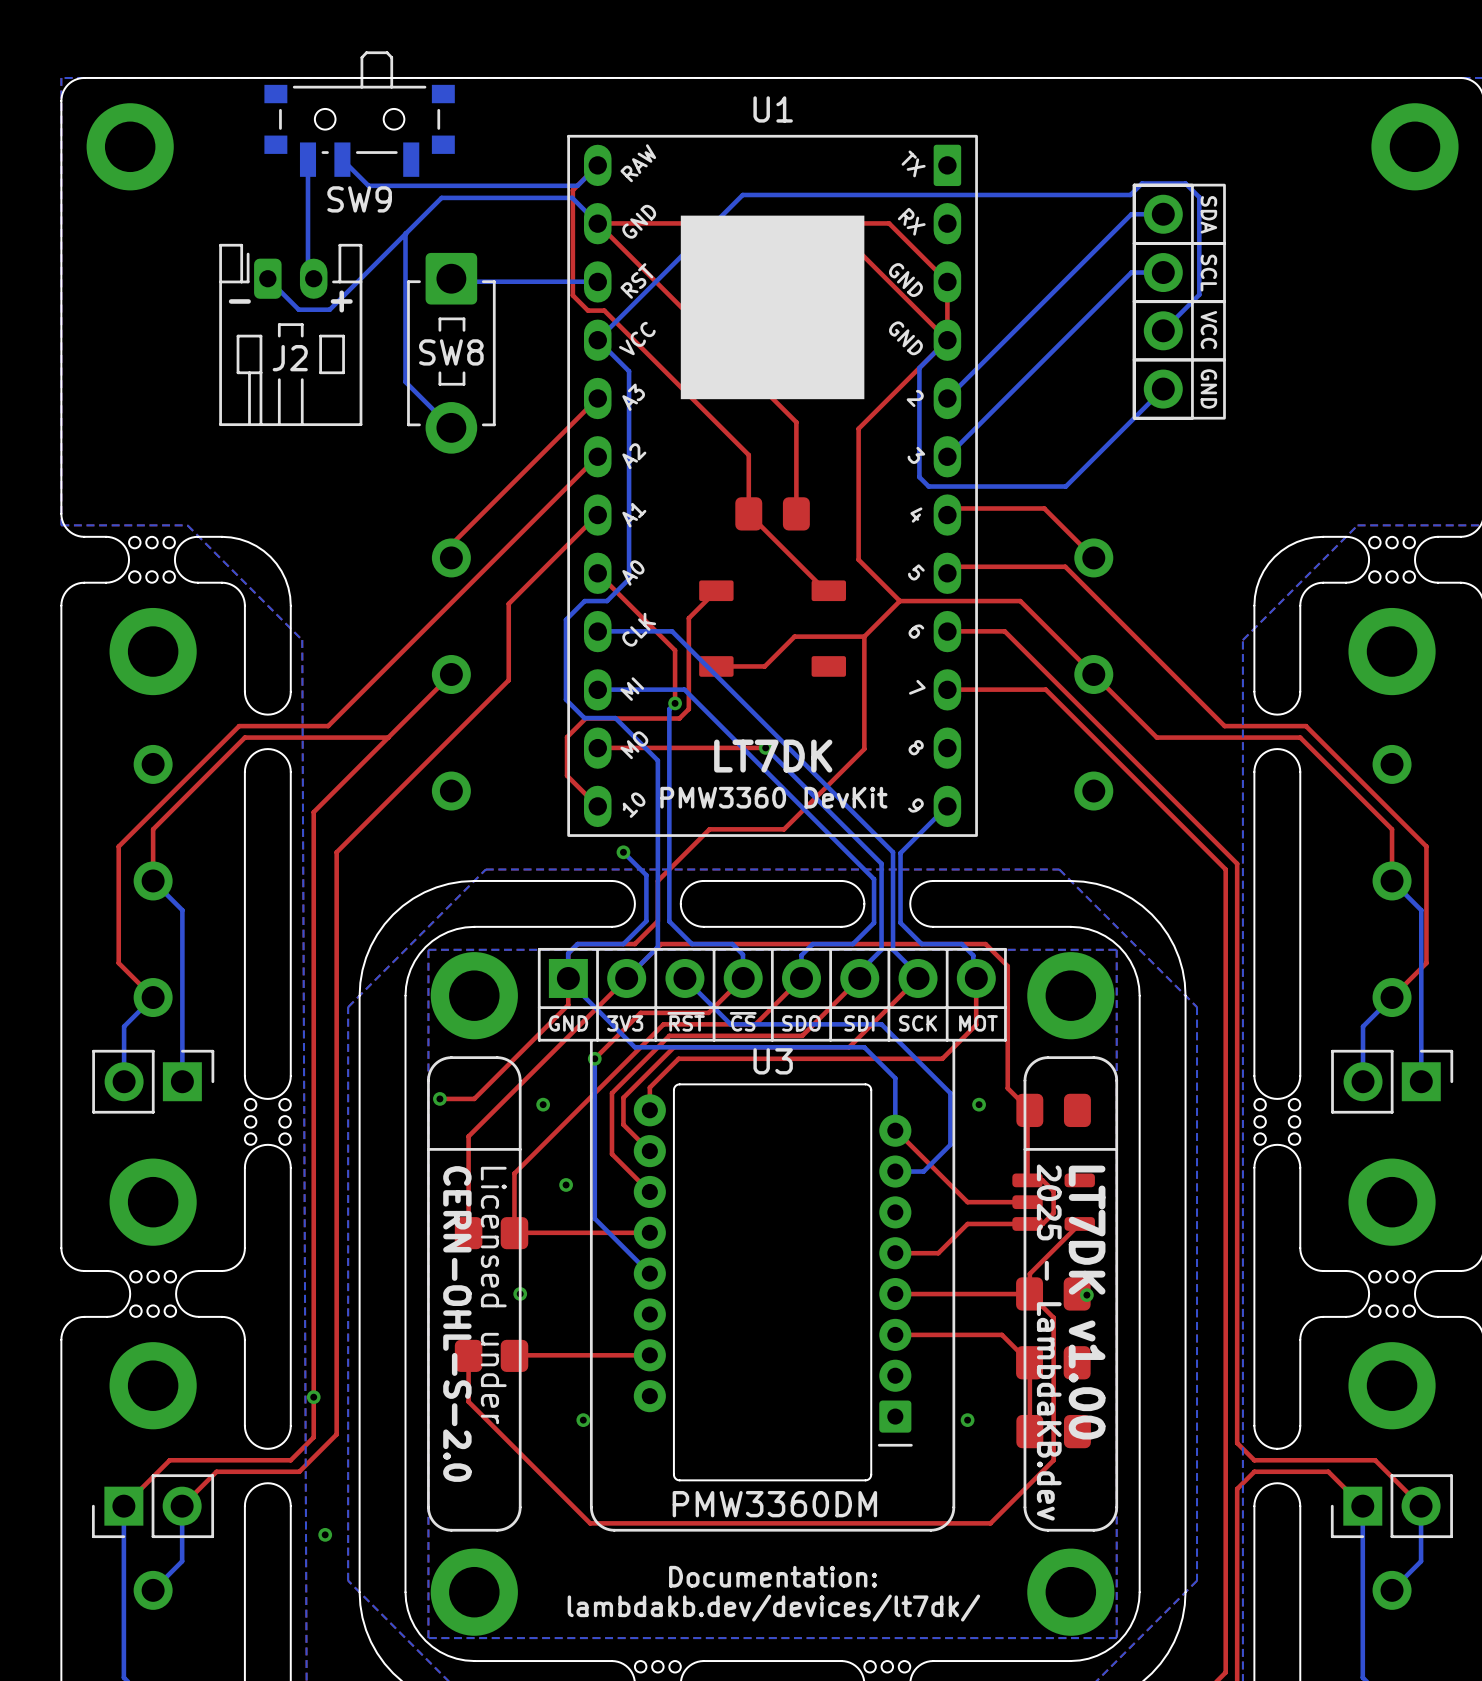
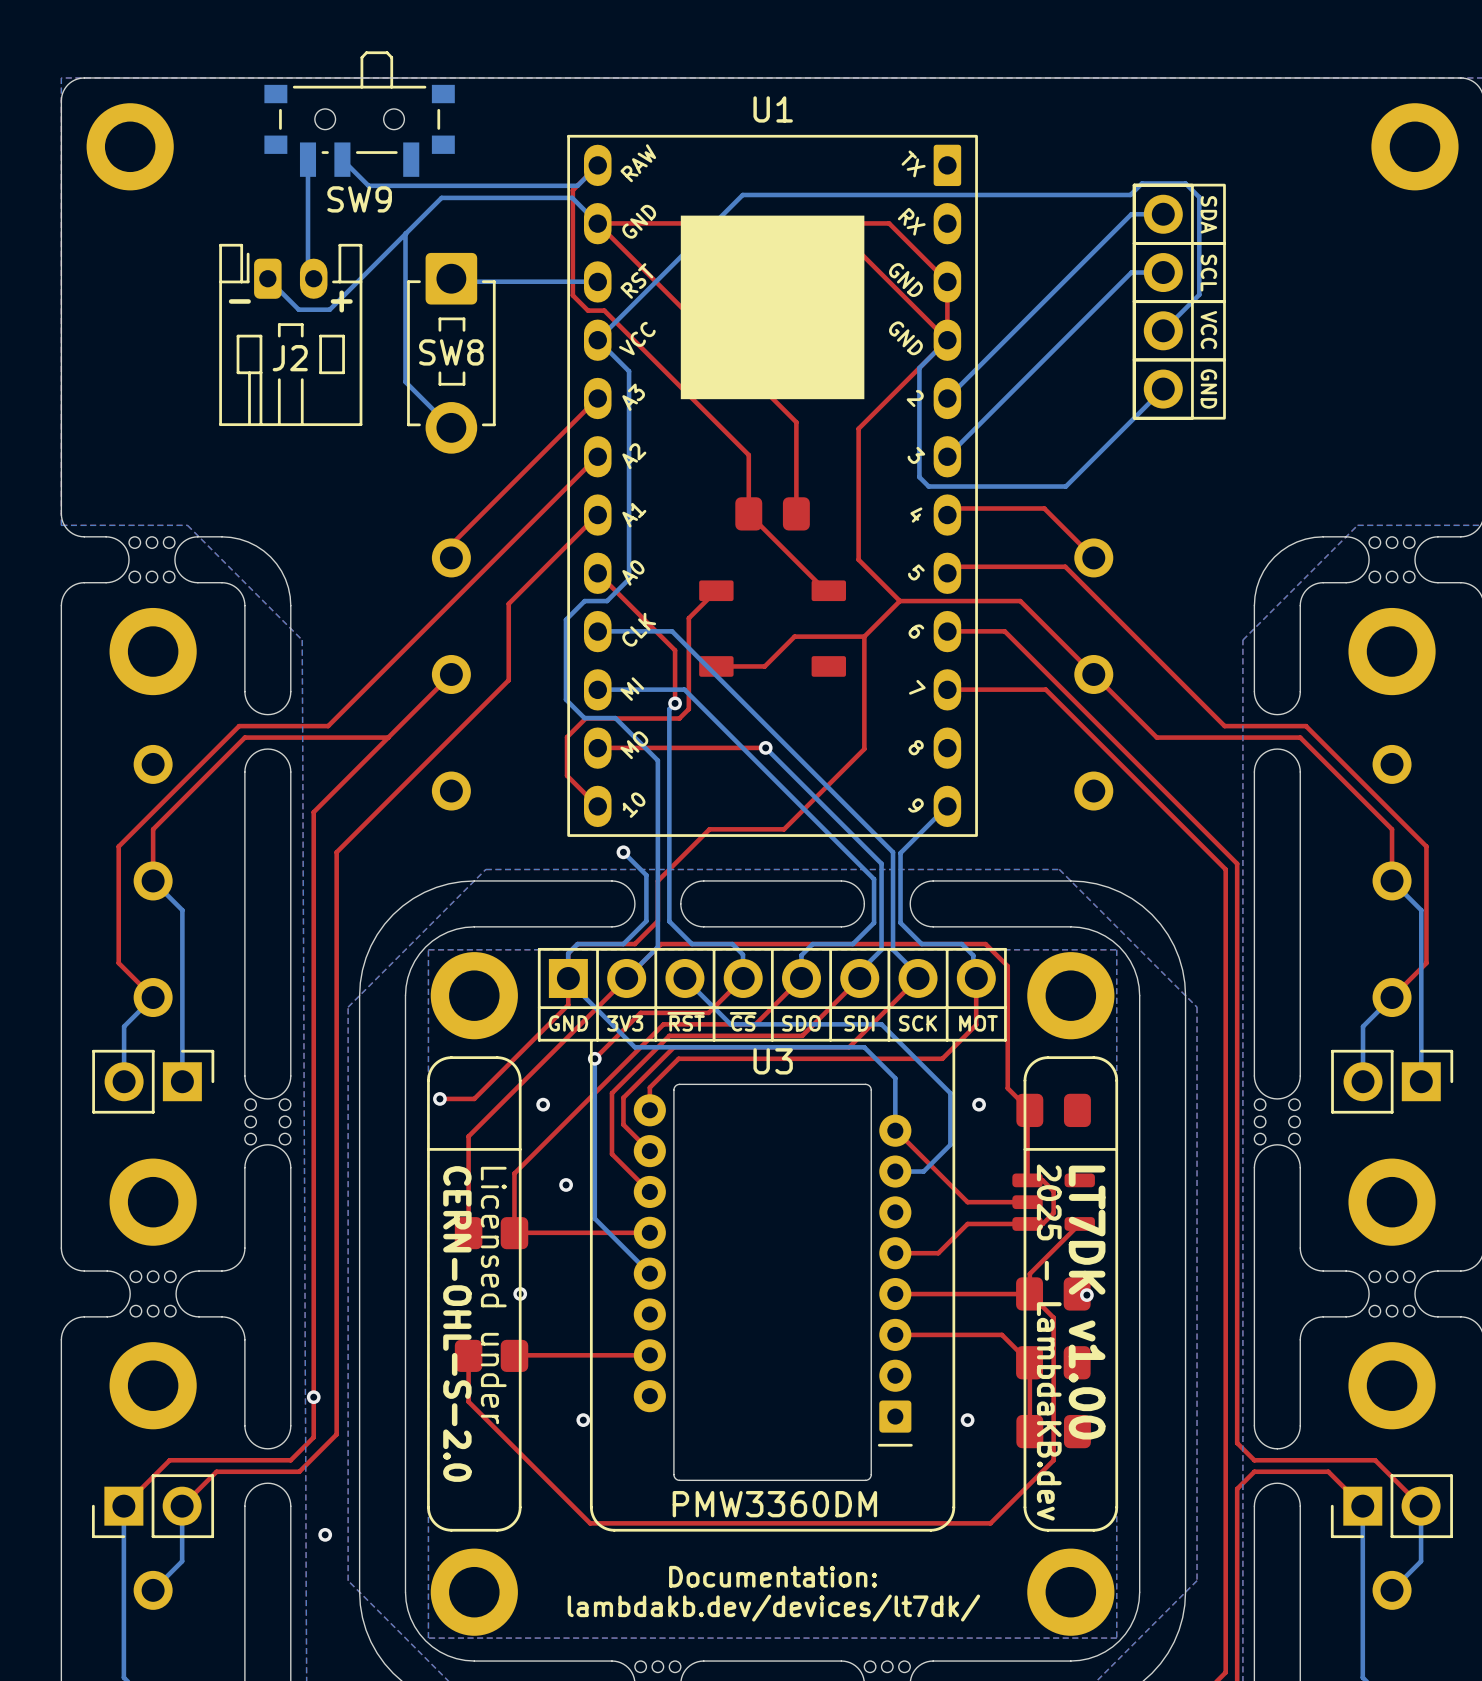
text: LT7DK (773, 756) -> none
text: PMW3360 DevKit (773, 797) -> none

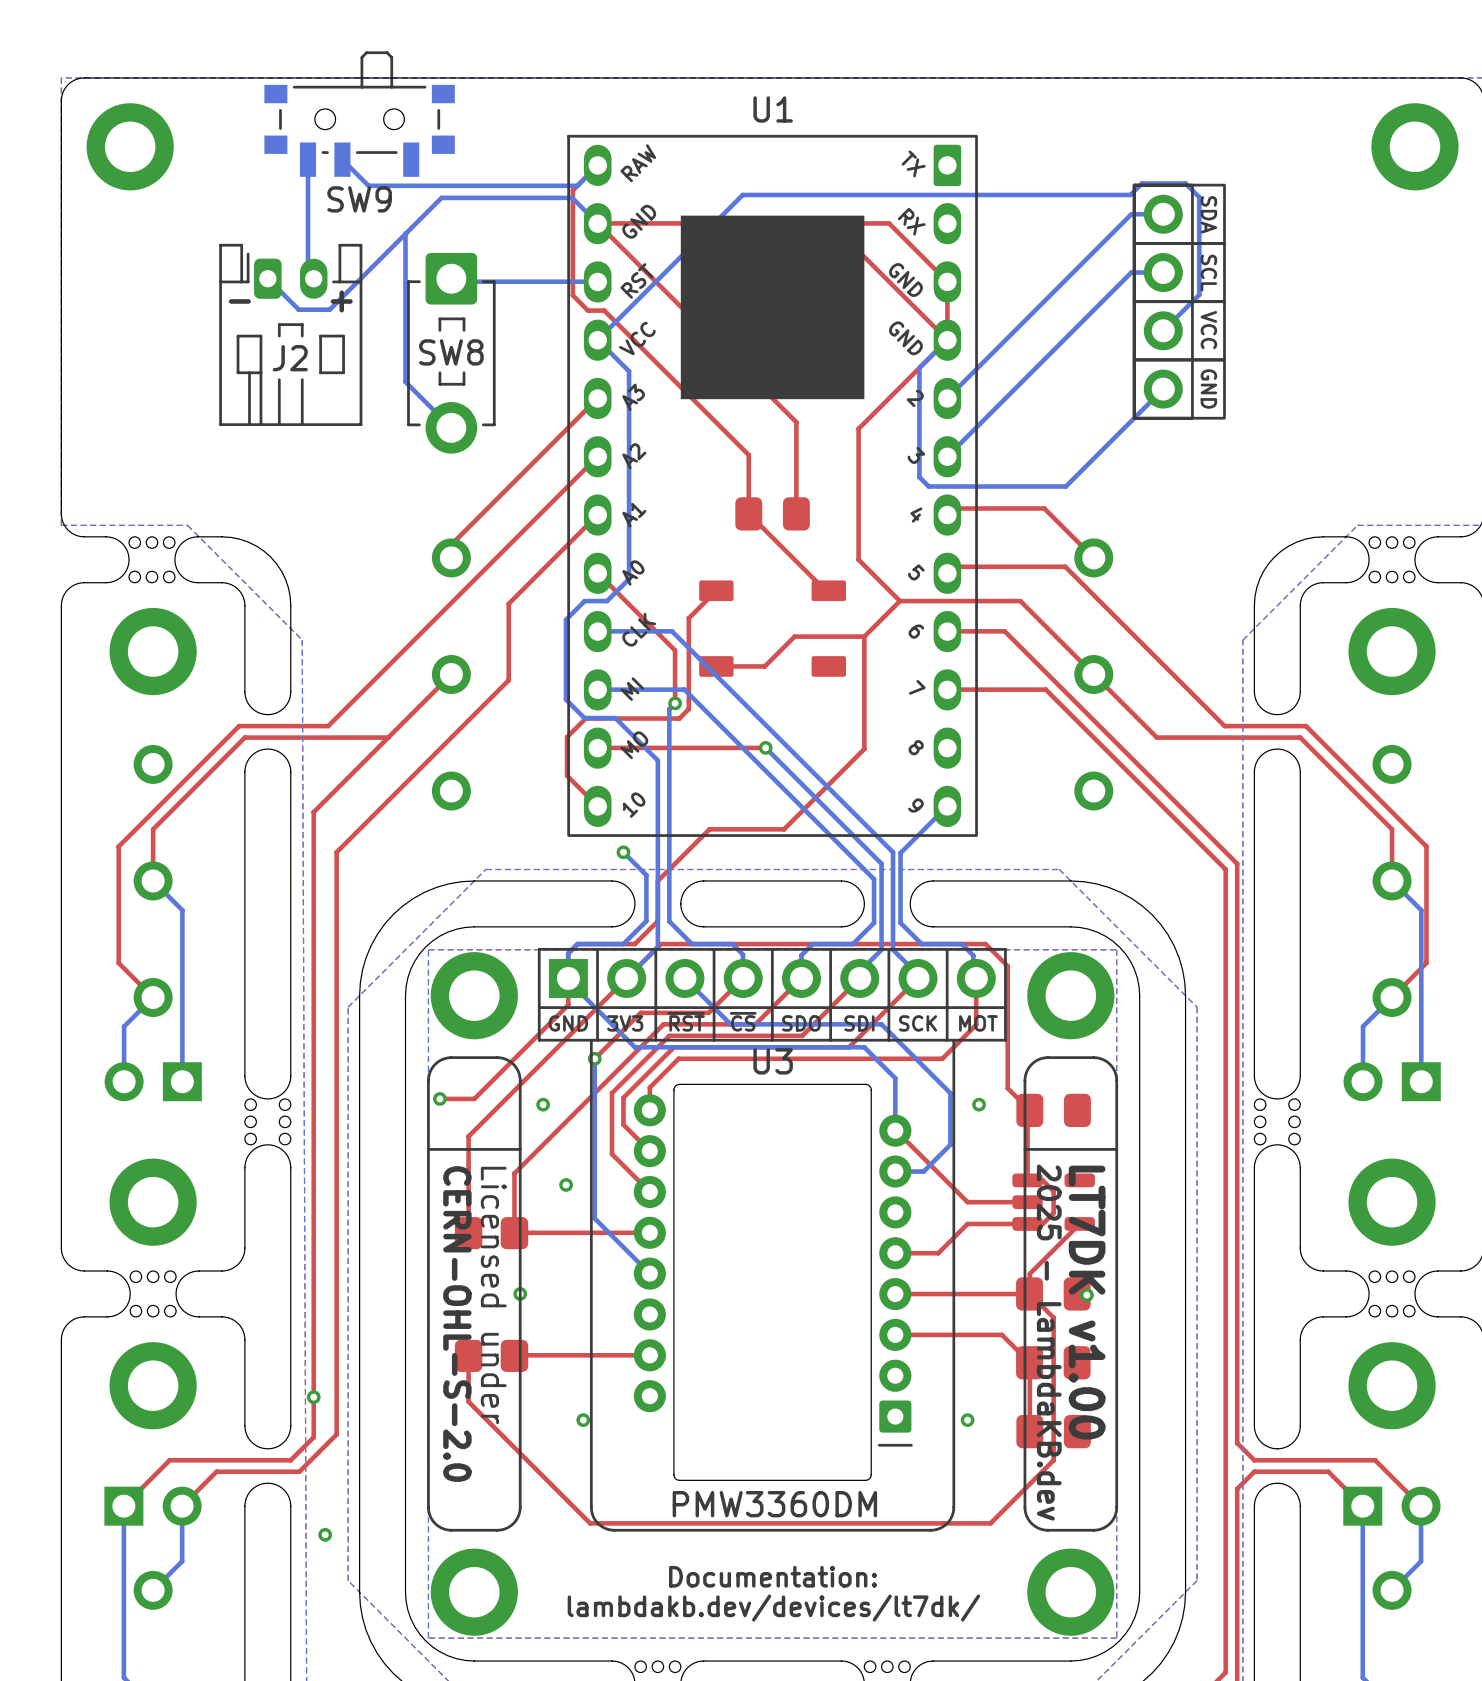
part side: bottom (153, 1081) -> top (153, 1081)
part side: bottom (1392, 1081) -> top (1392, 1081)
part side: bottom (153, 1506) -> top (153, 1506)
part side: bottom (1391, 1506) -> top (1391, 1506)

